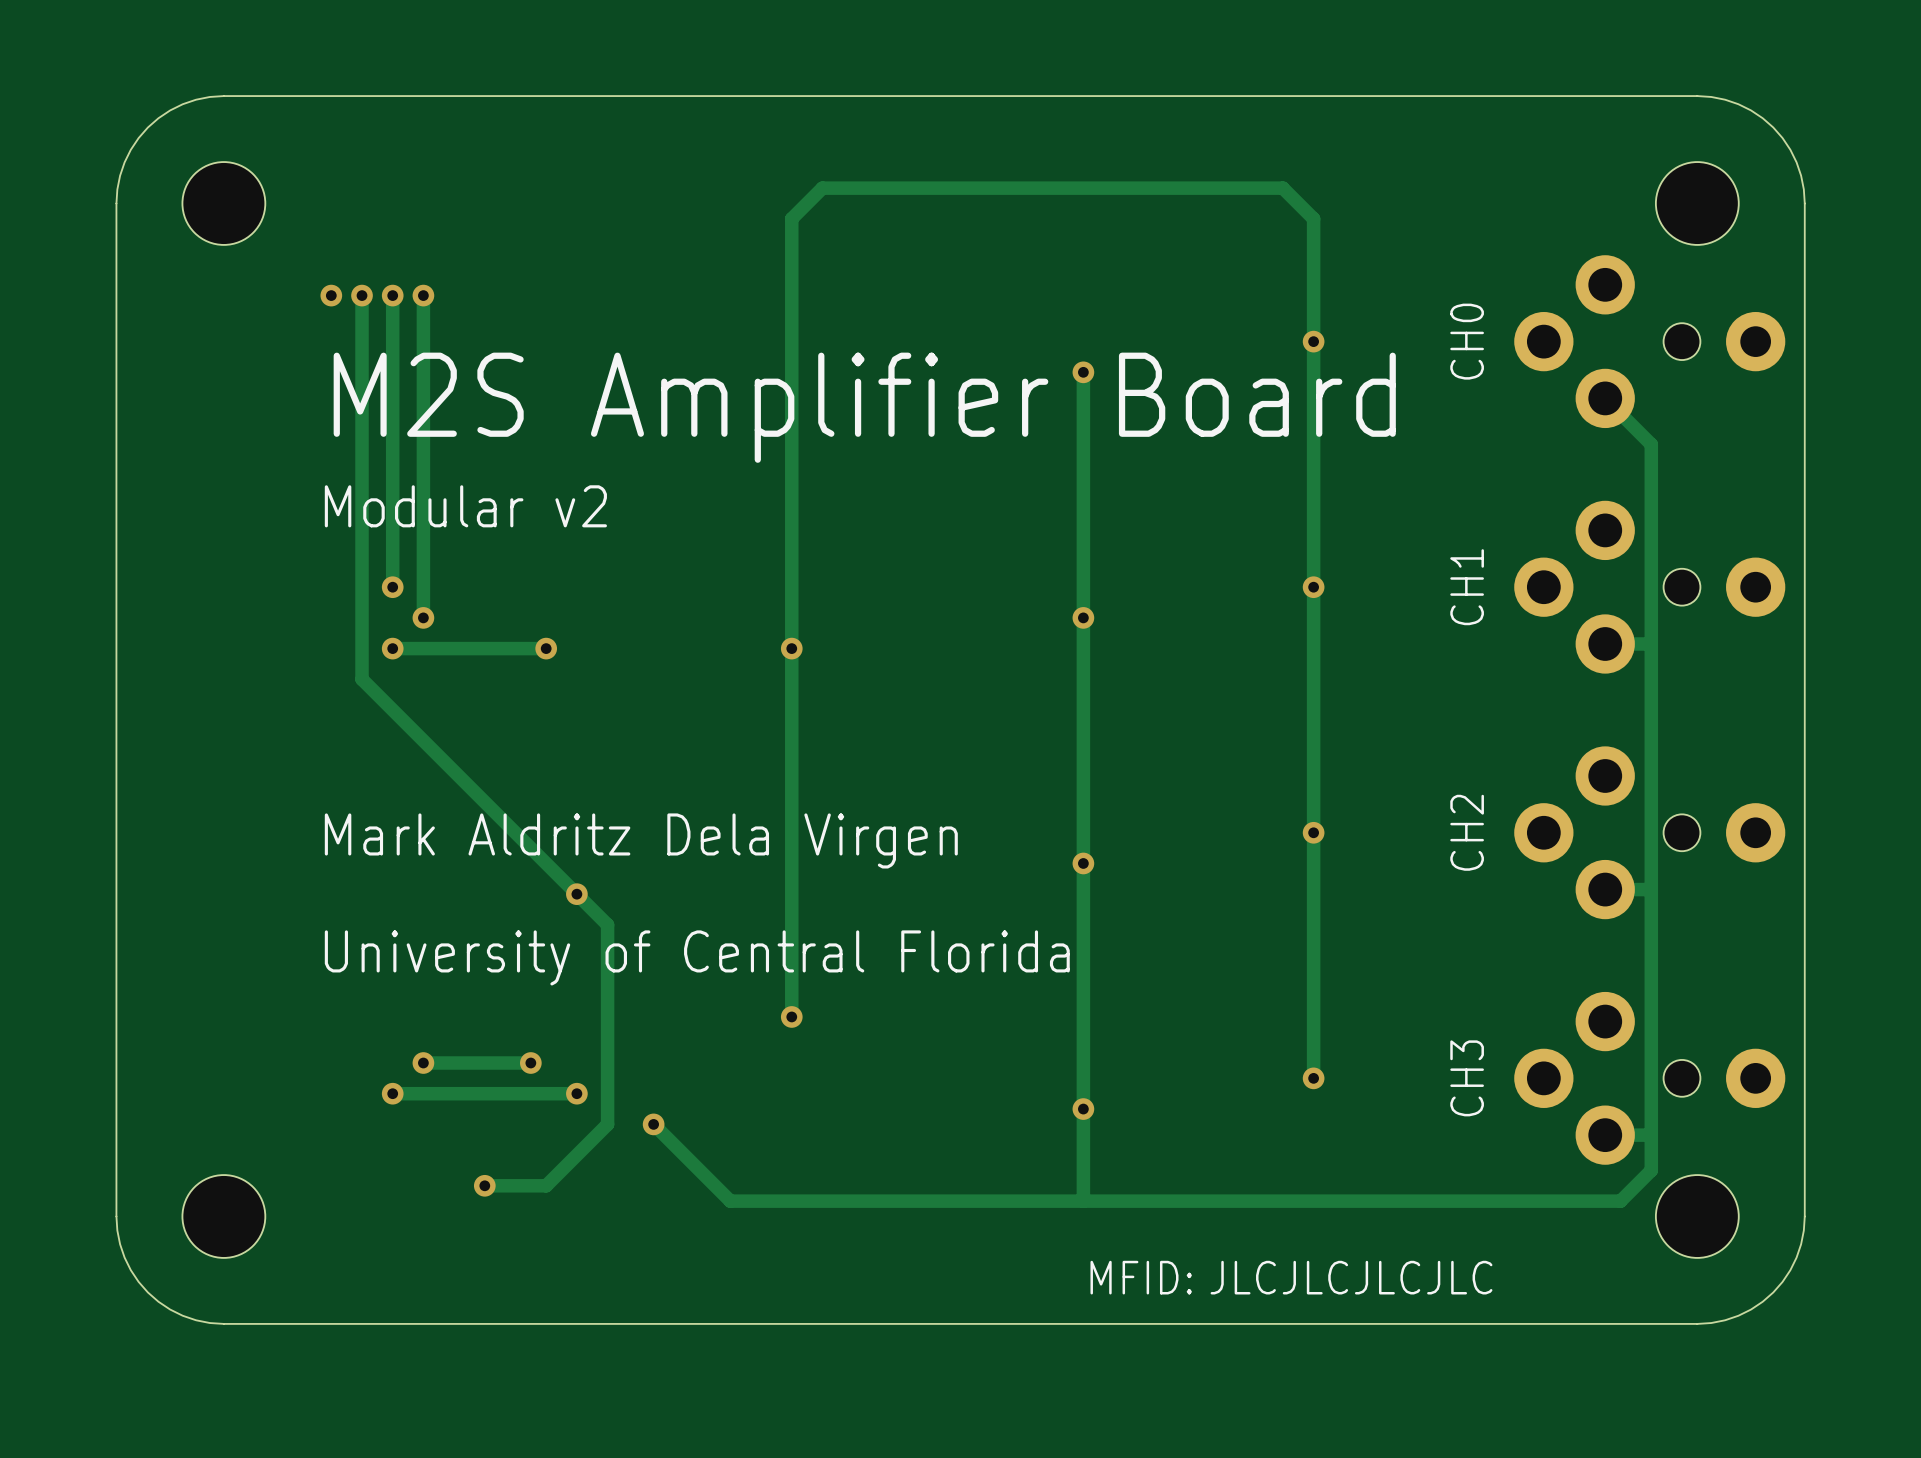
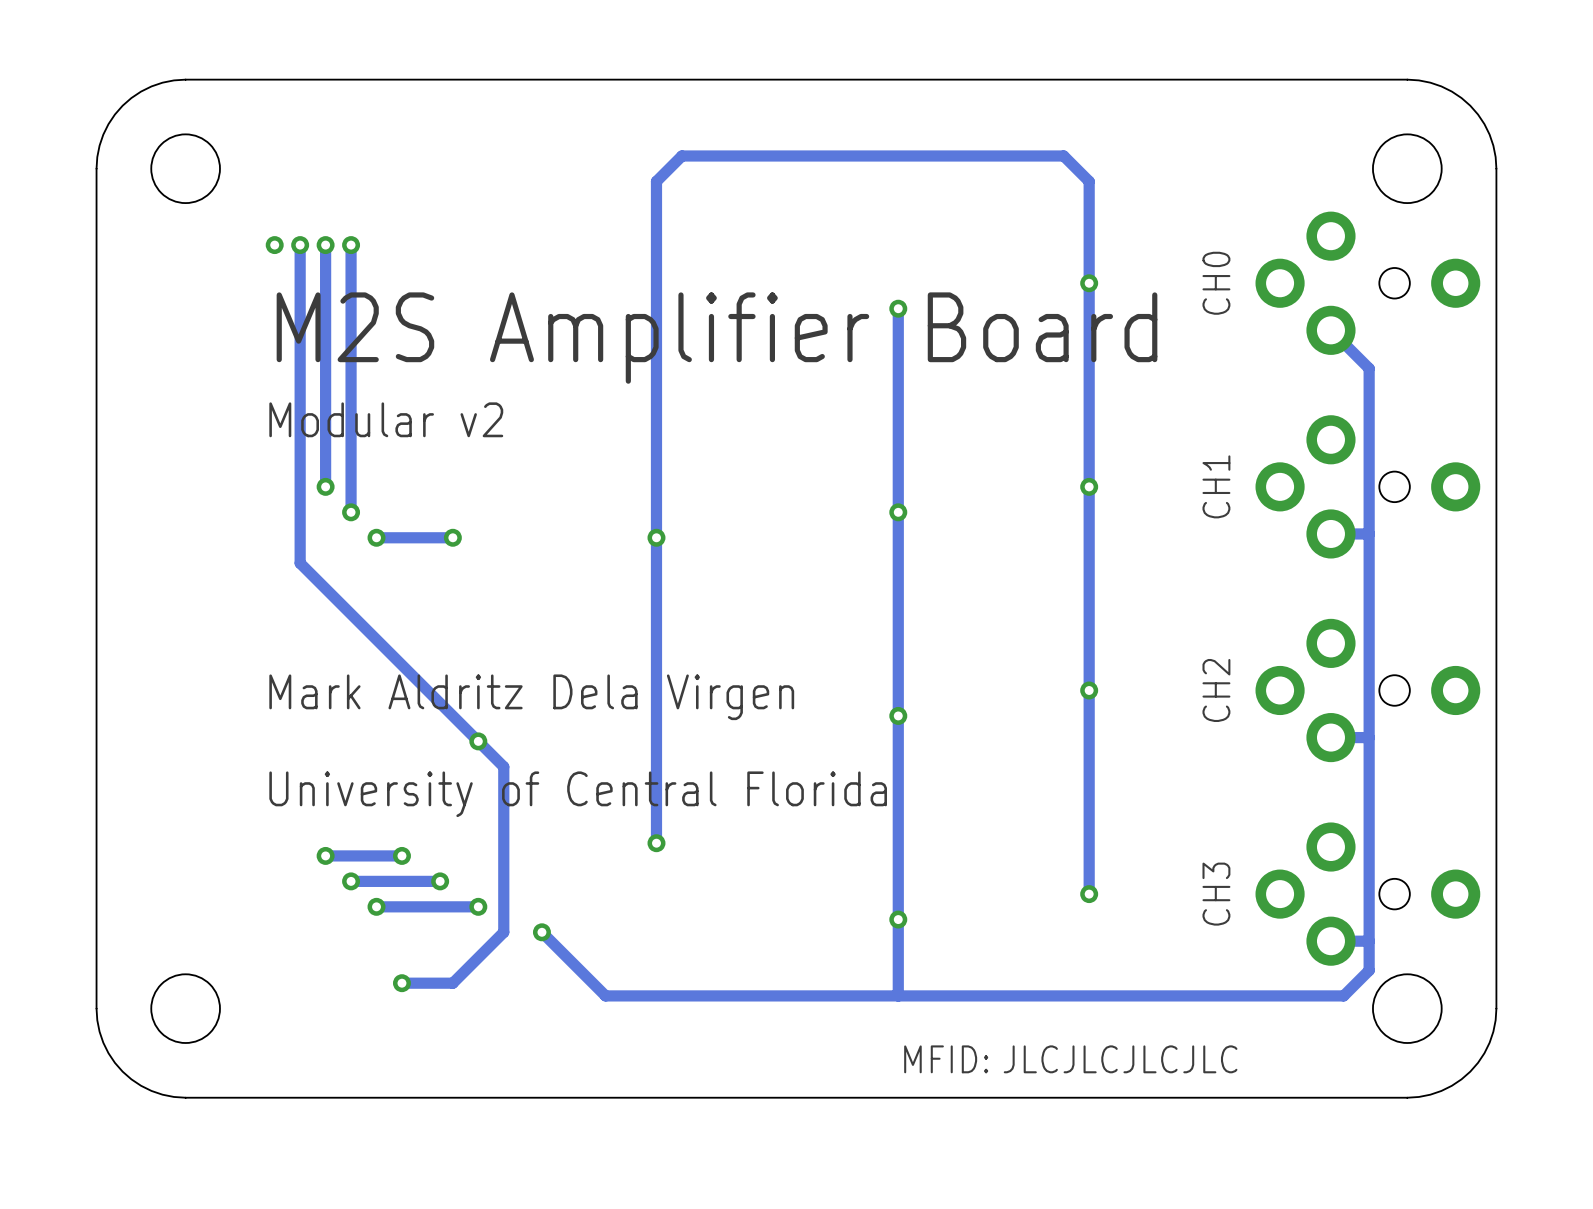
via position: (392, 648) -> (376, 537)
track: (454, 648) (392, 648) -> none
via: none -> (325, 855)
track: none -> (401, 855) (325, 855)
via: none -> (401, 855)
via: (392, 1093) -> none
track: (454, 1093) (392, 1093) -> none
via: none -> (376, 906)

